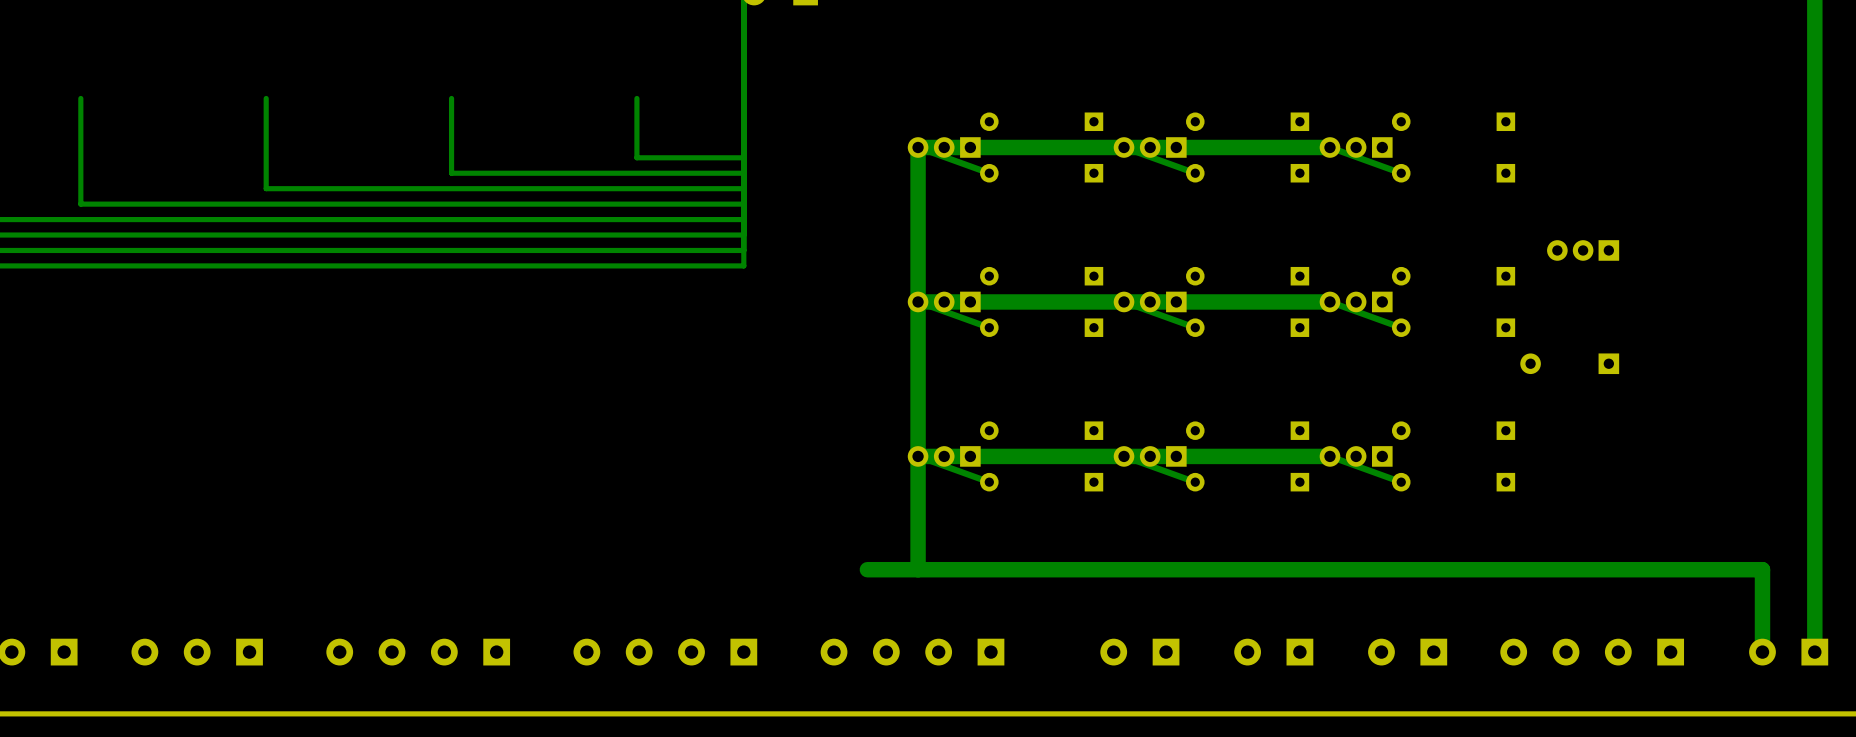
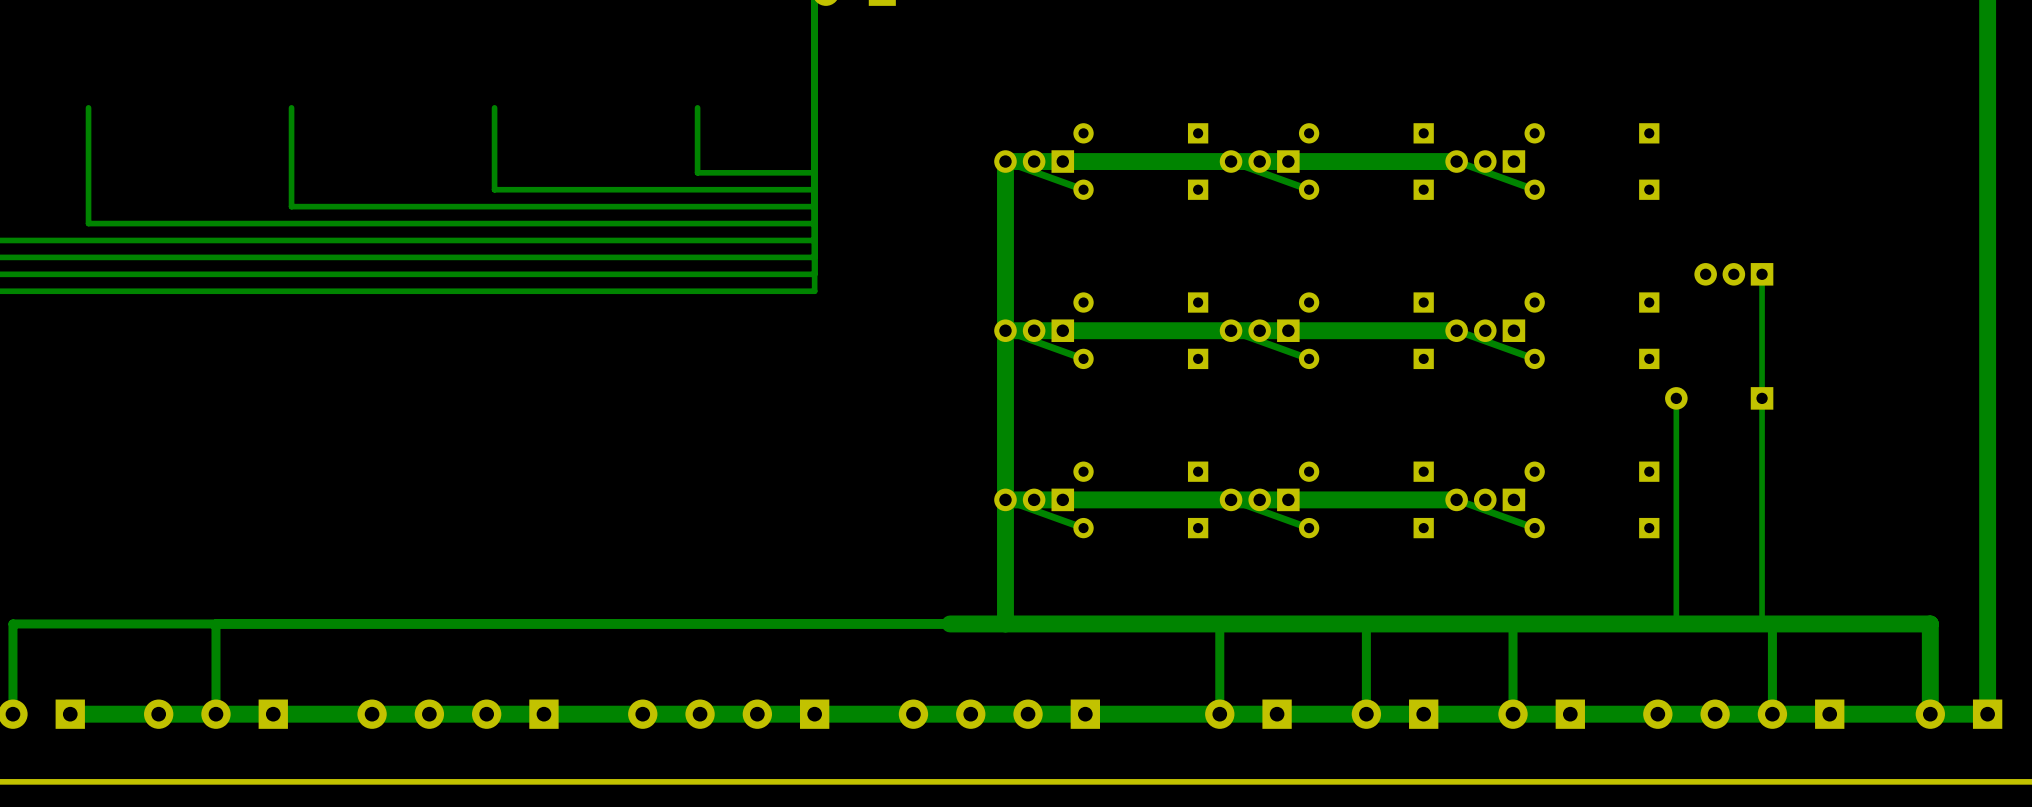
track: none -> (1762, 274) (1762, 623)
track: none -> (1676, 398) (1676, 623)
track: none -> (215, 623) (215, 714)
track: none -> (1219, 623) (1219, 714)
track: none -> (1366, 623) (1366, 714)
track: none -> (1513, 623) (1513, 714)
track: none -> (1772, 623) (1772, 714)
track: none -> (1930, 623) (12, 623) (12, 714)
track: none -> (1987, 714) (70, 714)

